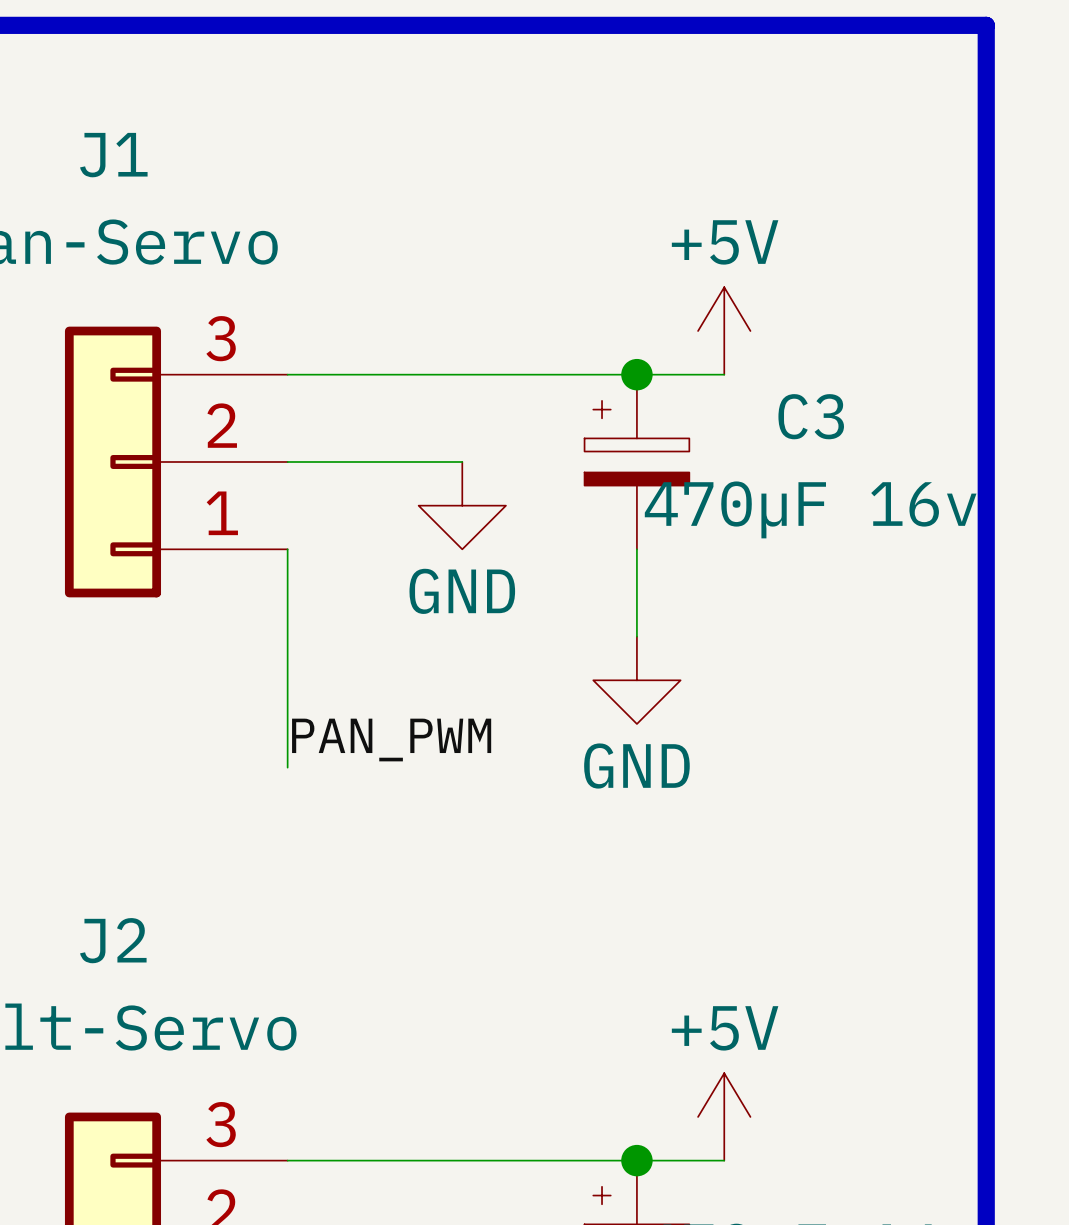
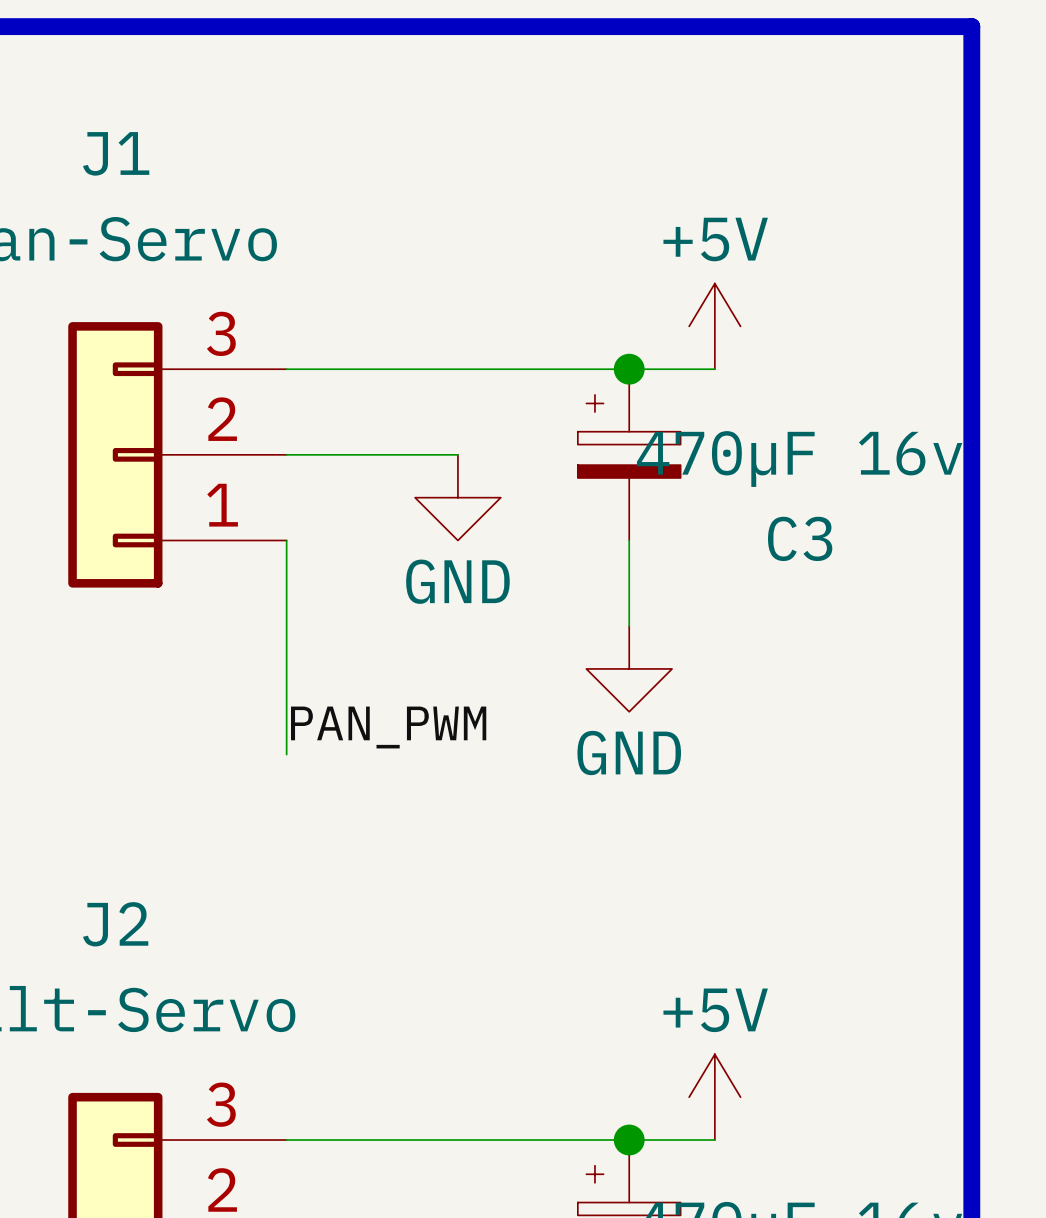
C3 name position: C3 (811, 416) -> C3 (800, 538)
C3 value position: 470µF 16v (810, 509) -> 470µF 16v (799, 459)

